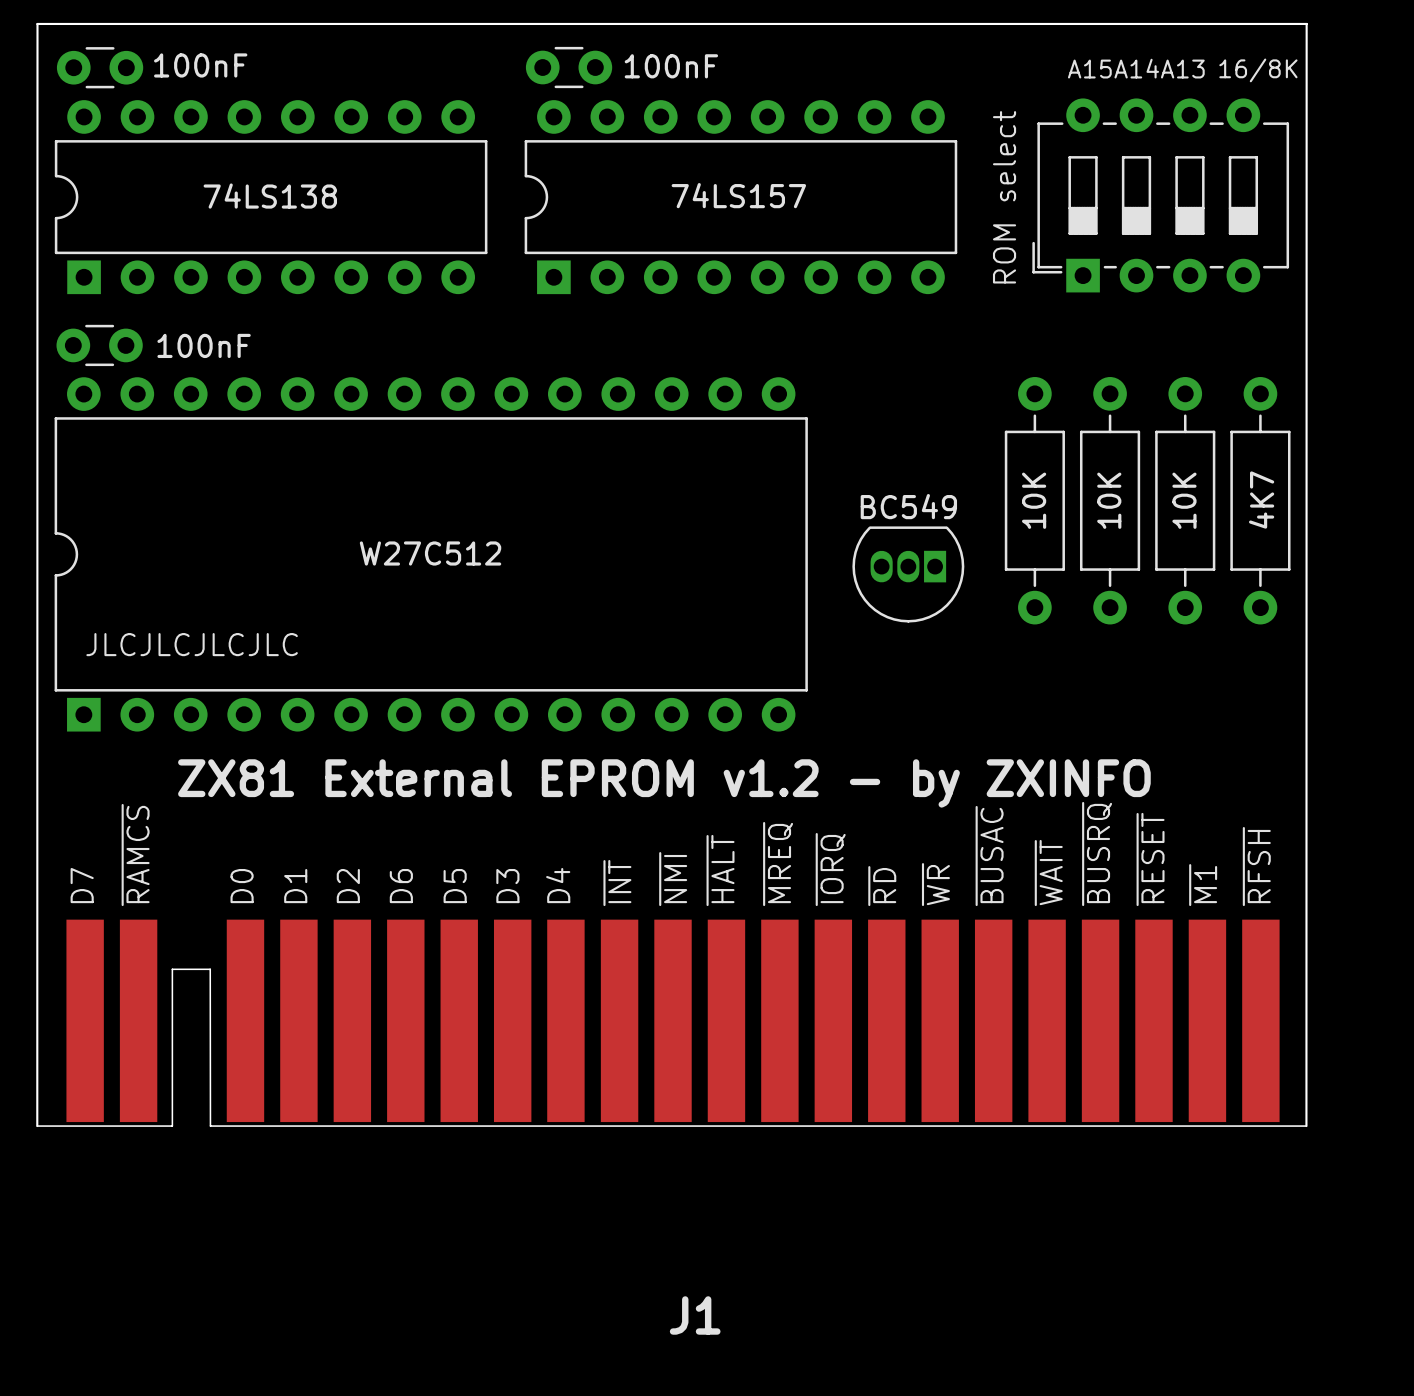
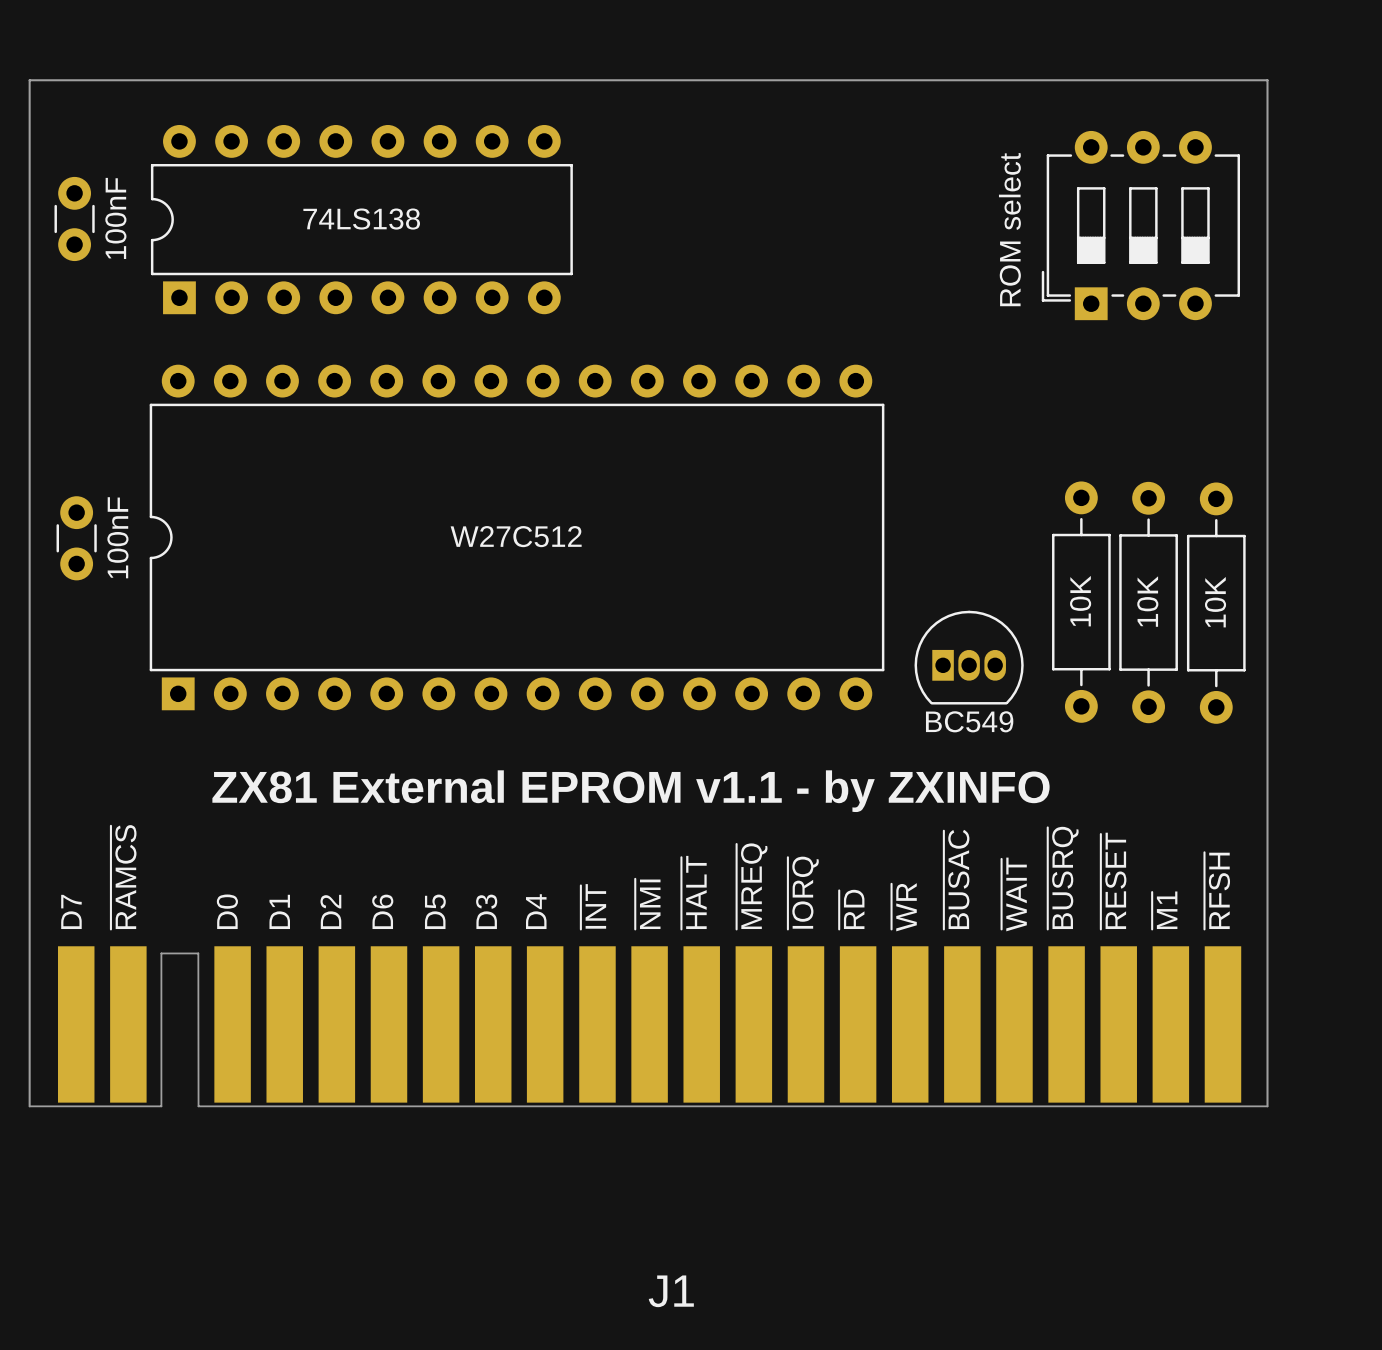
part: 100nF (100, 67) -> none
part: 100nF (569, 67) -> none
text: A15A14A13 (1136, 68) -> none
text: 16/8K (1258, 70) -> none
part: (1160, 195) -> none
part position: (271, 197) -> (361, 219)
part: 74LS157 (740, 197) -> none
text position: ROM select (1004, 197) -> ROM select (1009, 229)
part: none -> 100nF (74, 218)
part: none -> (1140, 225)
part: 100nF (99, 345) -> none
part: 10K (1034, 500) -> none
part: 10K (1110, 500) -> none
part: 10K (1185, 500) -> none
part: 4K7 (1260, 500) -> none
part: none -> 100nF (76, 538)
part position: (431, 554) -> (517, 537)
part rotation: 0° (908, 574) -> 180° (969, 657)
part position: (908, 574) -> (969, 657)
part: none -> 10K (1081, 602)
part: none -> 10K (1148, 602)
part: none -> 10K (1216, 603)
text: JLCJLCJLCJLC (192, 644) -> none
text: ZX81 External EPROM v1.2 - by ZXINFO (664, 783) -> ZX81 External EPROM v1.1 - by ZXINFO (631, 791)
J1 footprint: [66, 919, 1280, 1123] -> [57, 946, 1242, 1103]
board edge: (37, 1126) (37, 23) (1306, 23) (1306, 1126) -> (29, 1106) (29, 80) (1267, 80) (1267, 1106)

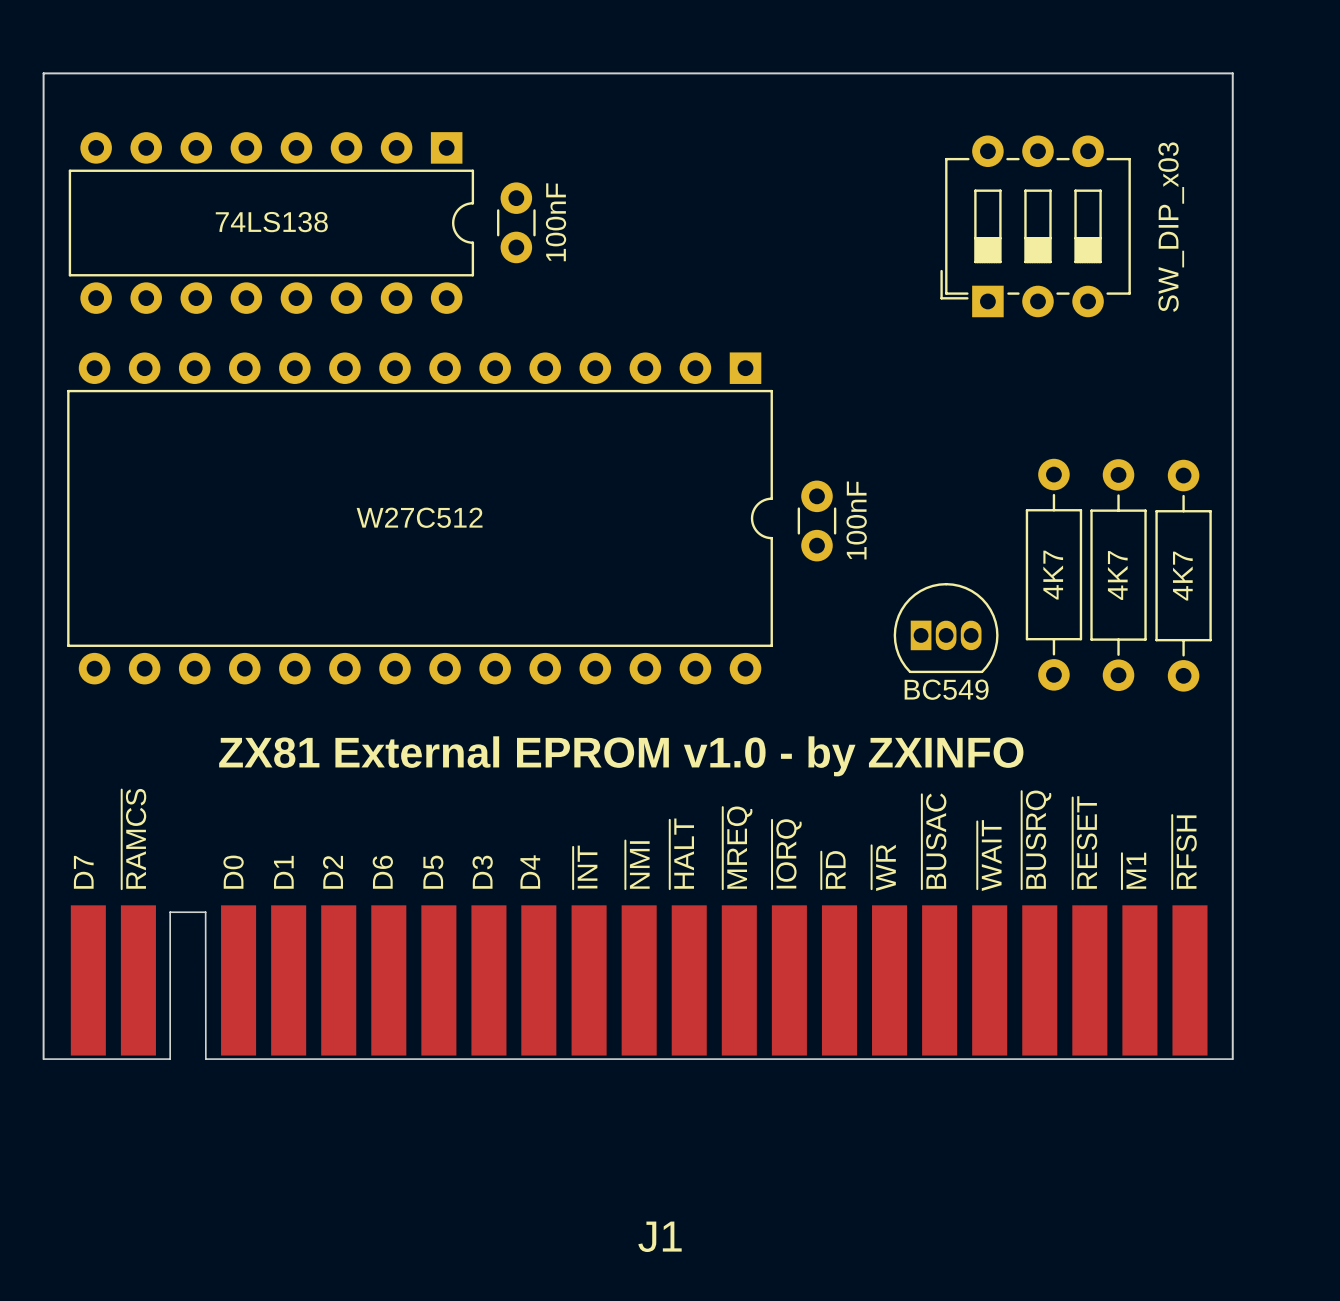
part: 100nF (74, 218) -> none
part rotation: 0° (361, 219) -> 180° (271, 223)
part: (1140, 225) -> none
text: ROM select (1009, 229) -> none
part: none -> 100nF (516, 222)
part: none -> SW_DIP_x03 (1035, 226)
part rotation: 0° (517, 537) -> 180° (420, 518)
part: 100nF (76, 538) -> none
part: none -> 100nF (816, 520)
part value: 10K (1080, 601) -> 4K7 (1053, 575)
part value: 10K (1147, 601) -> 4K7 (1117, 575)
part value: 10K (1215, 602) -> 4K7 (1182, 576)
text: ZX81 External EPROM v1.1 - by ZXINFO (631, 791) -> ZX81 External EPROM v1.0 - by ZXINFO (621, 756)

